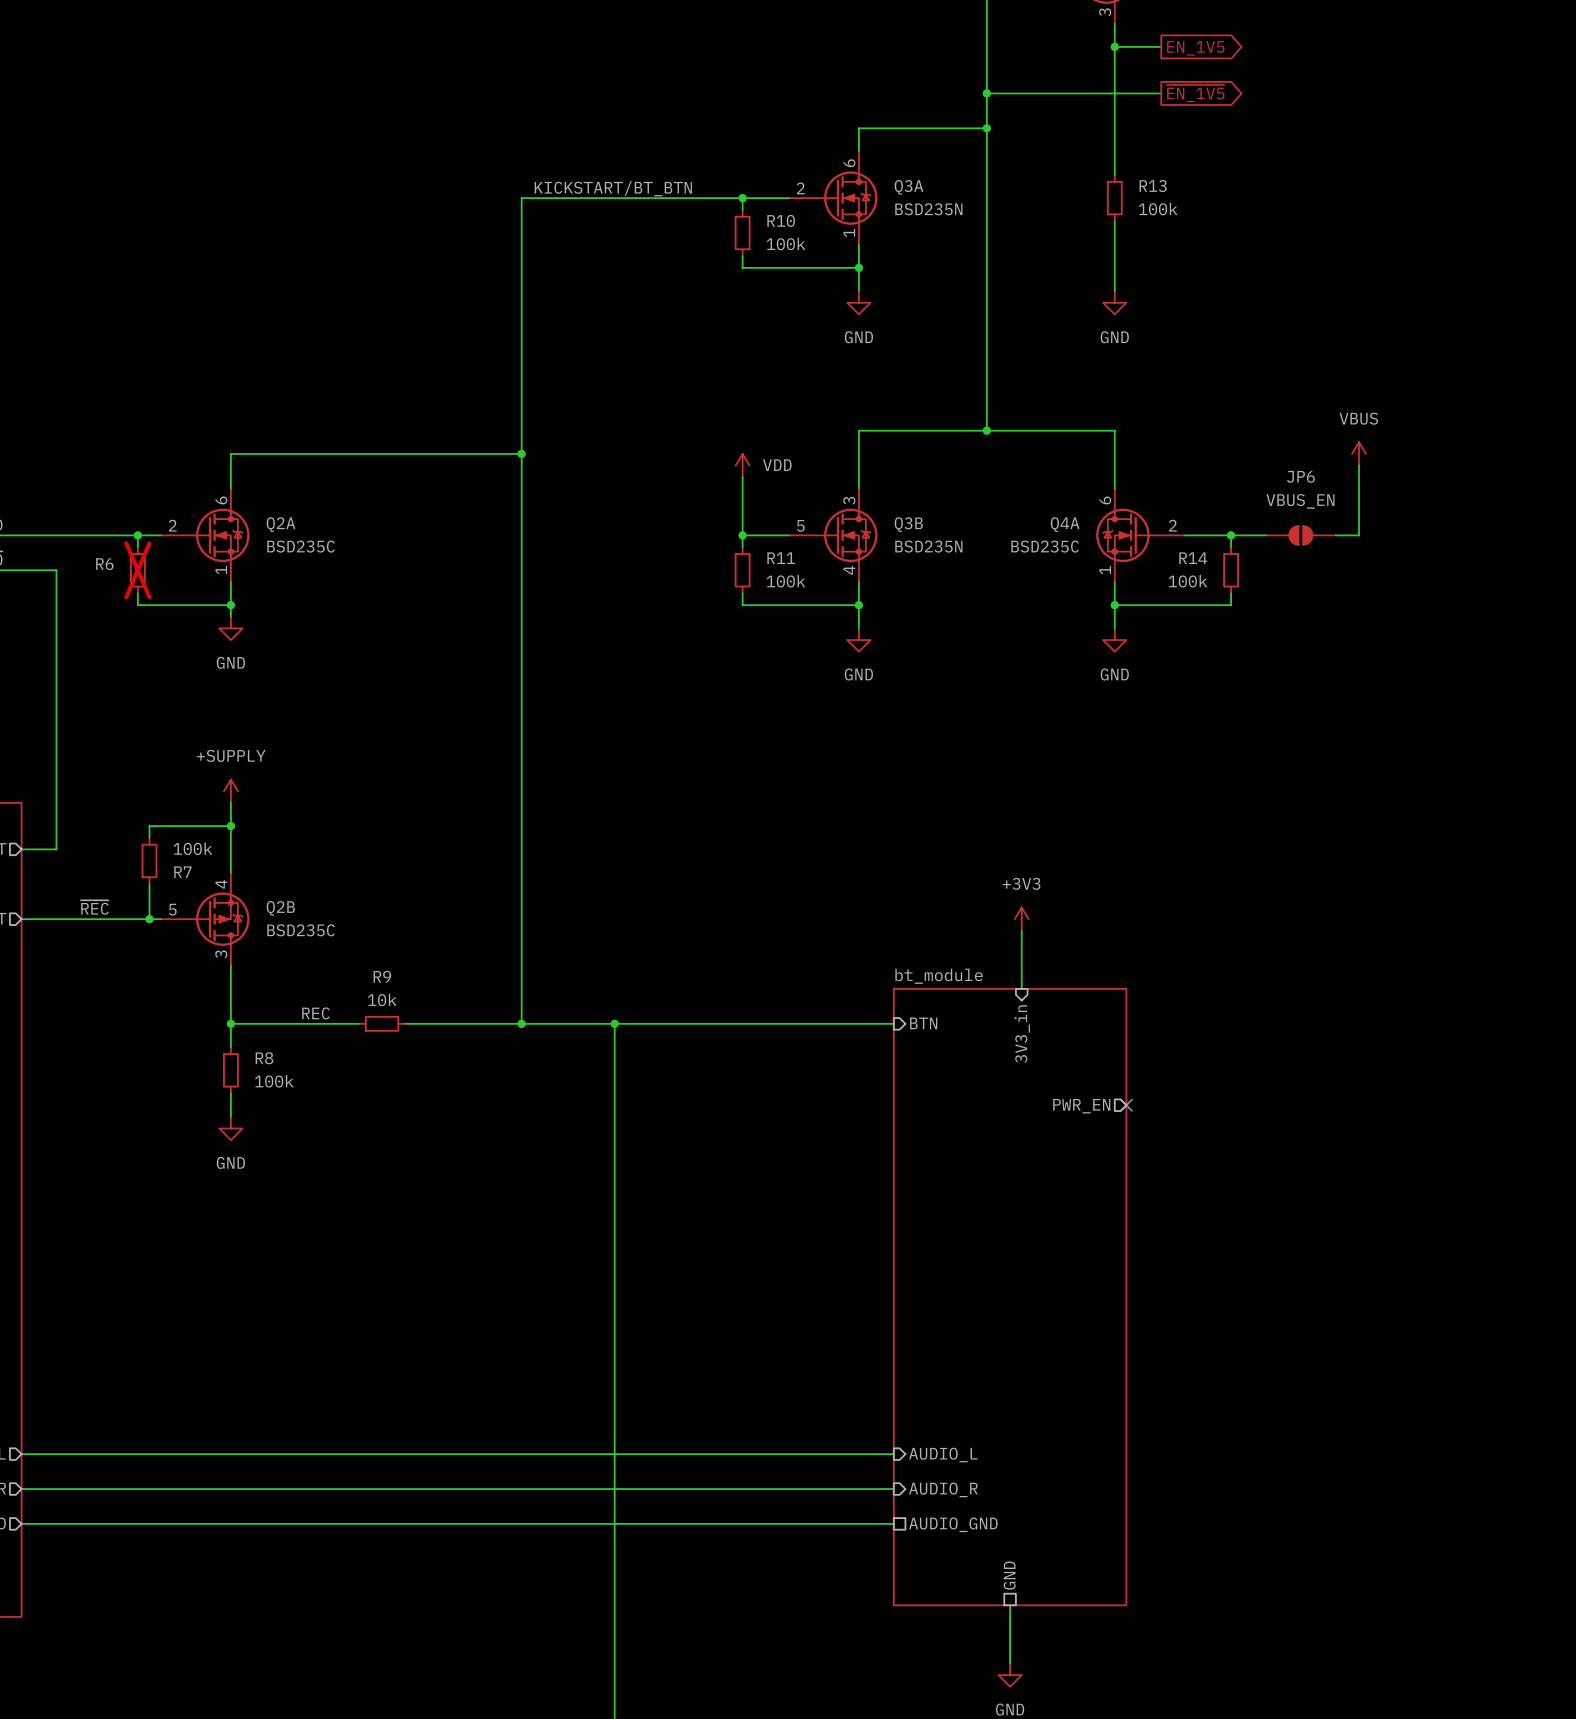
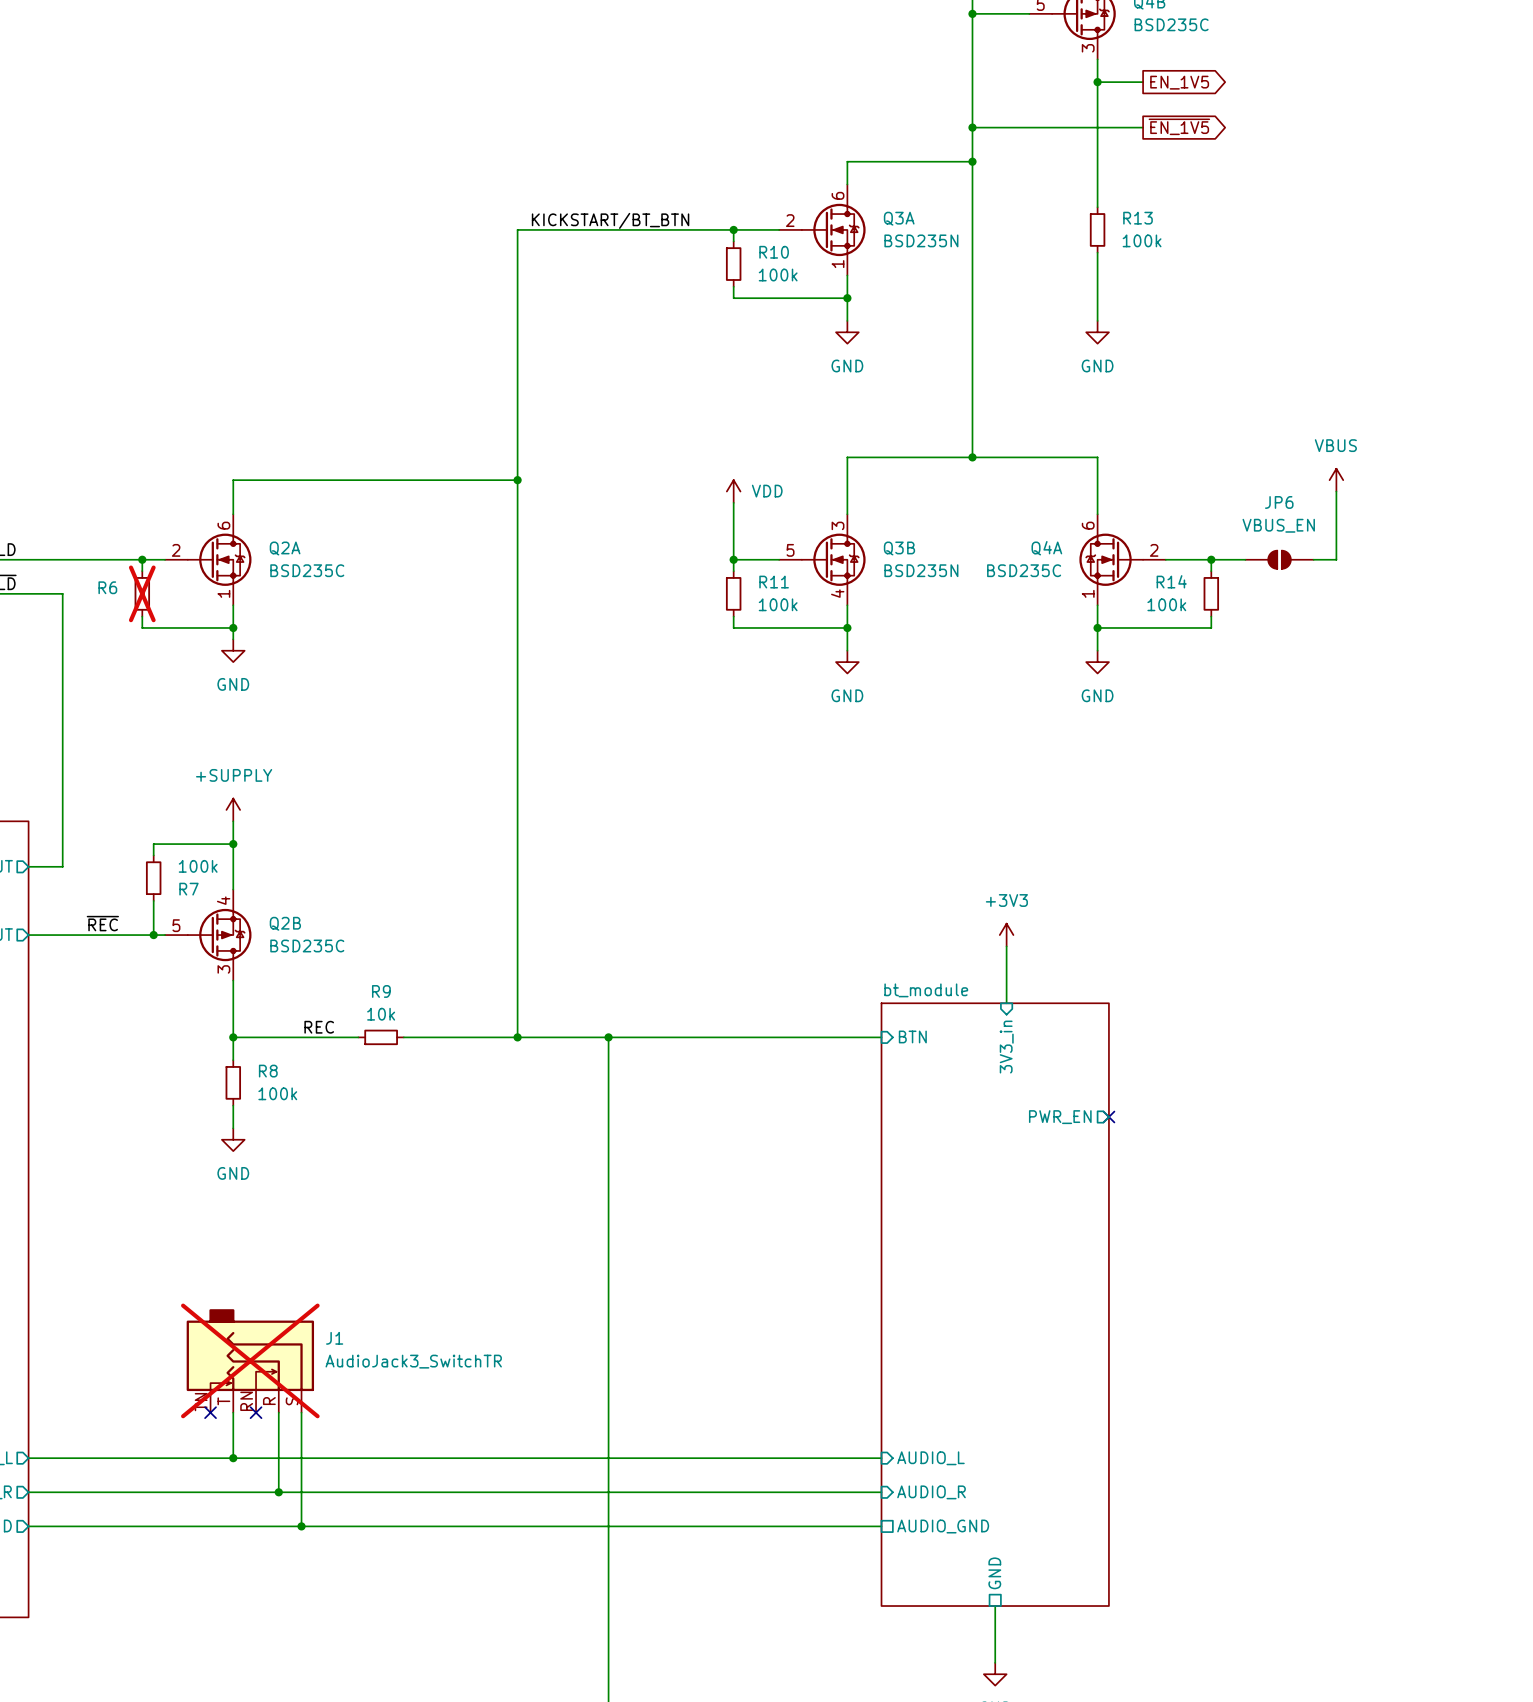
J1: none -> AudioJack3_SwitchTR (250, 1360)
no-connect mark: none -> (210, 1412)
wire: none -> (233, 1412) (233, 1458)
no-connect mark: none -> (256, 1412)
wire: none -> (278, 1412) (278, 1492)
wire: none -> (301, 1412) (301, 1526)
junction: none -> (233, 1458)
junction: none -> (278, 1492)
junction: none -> (301, 1526)

